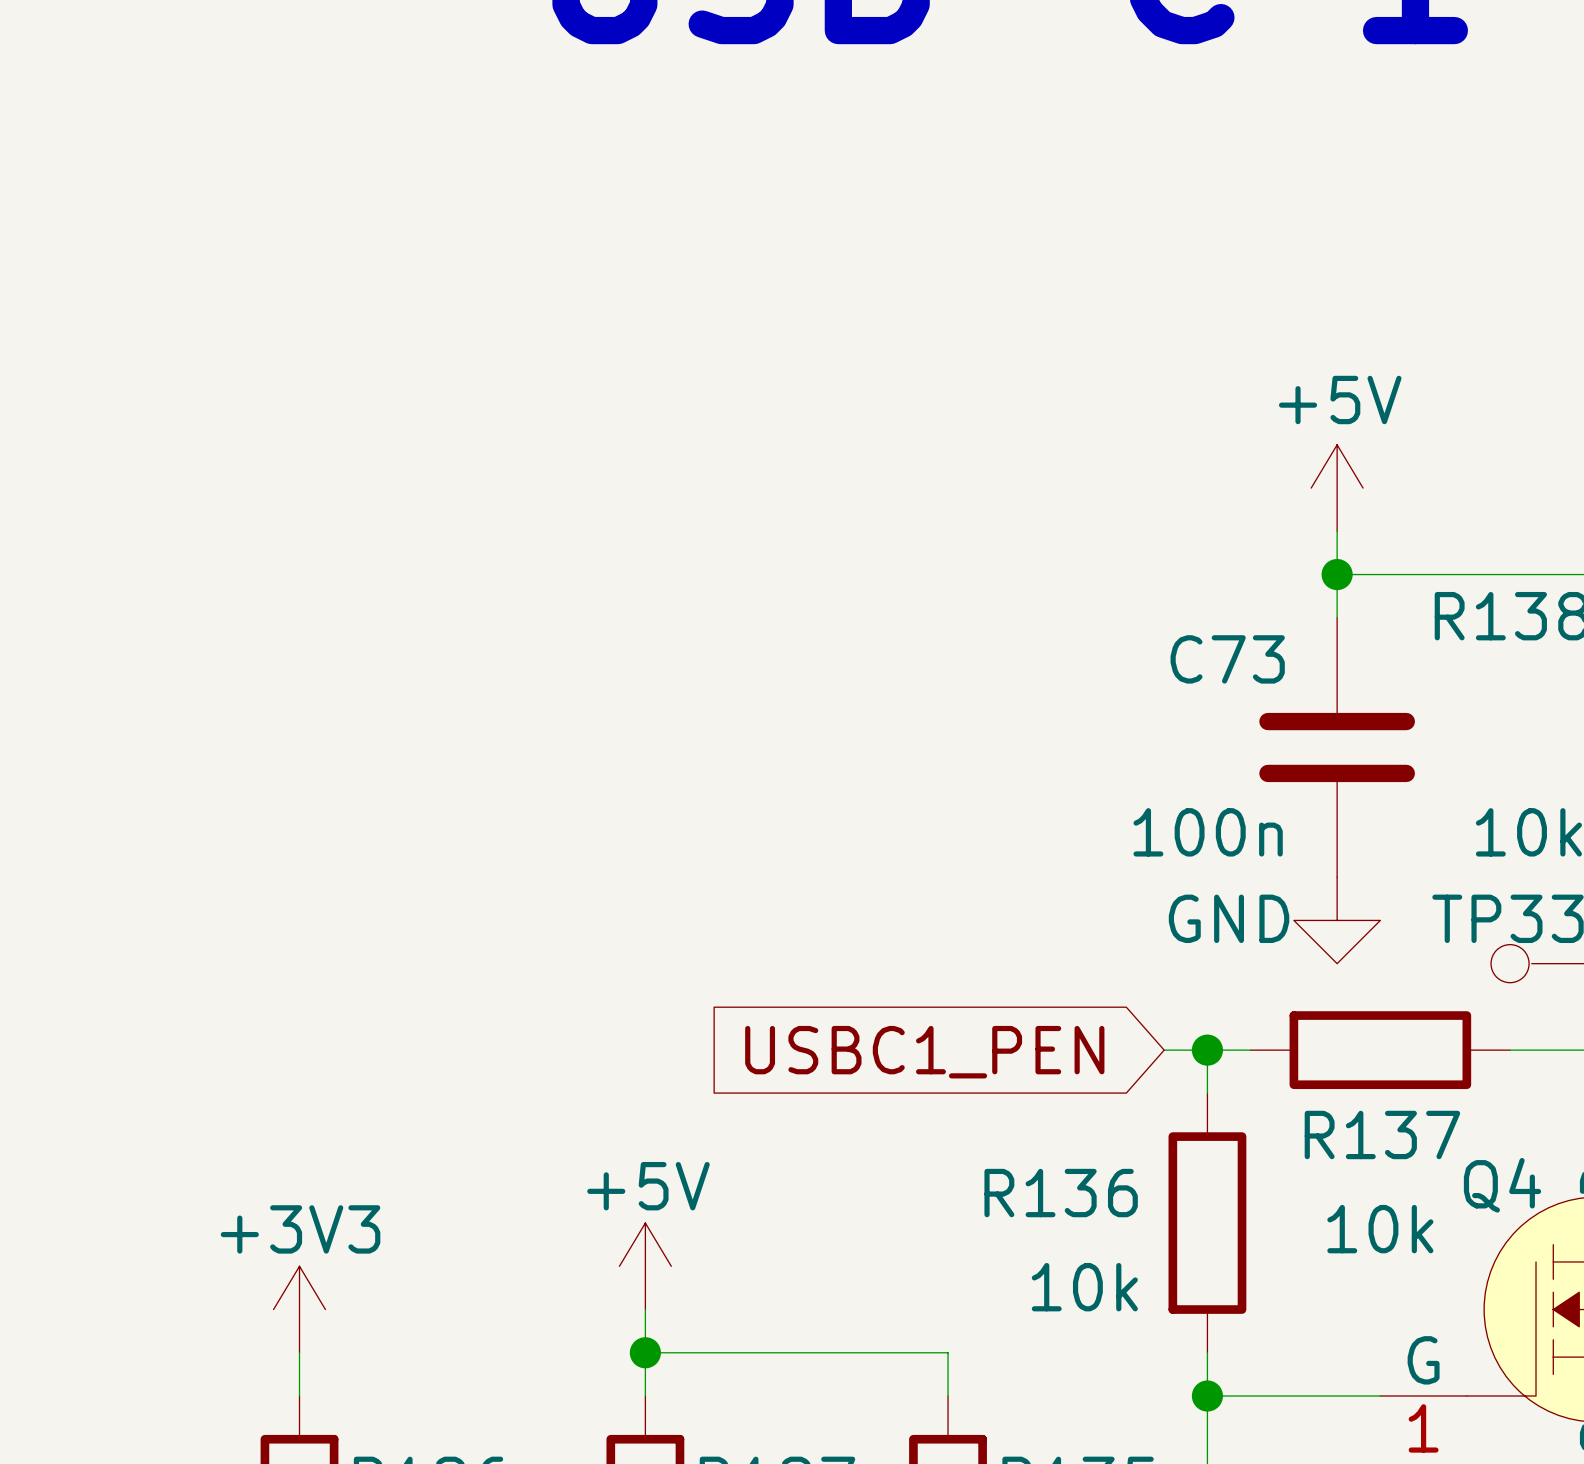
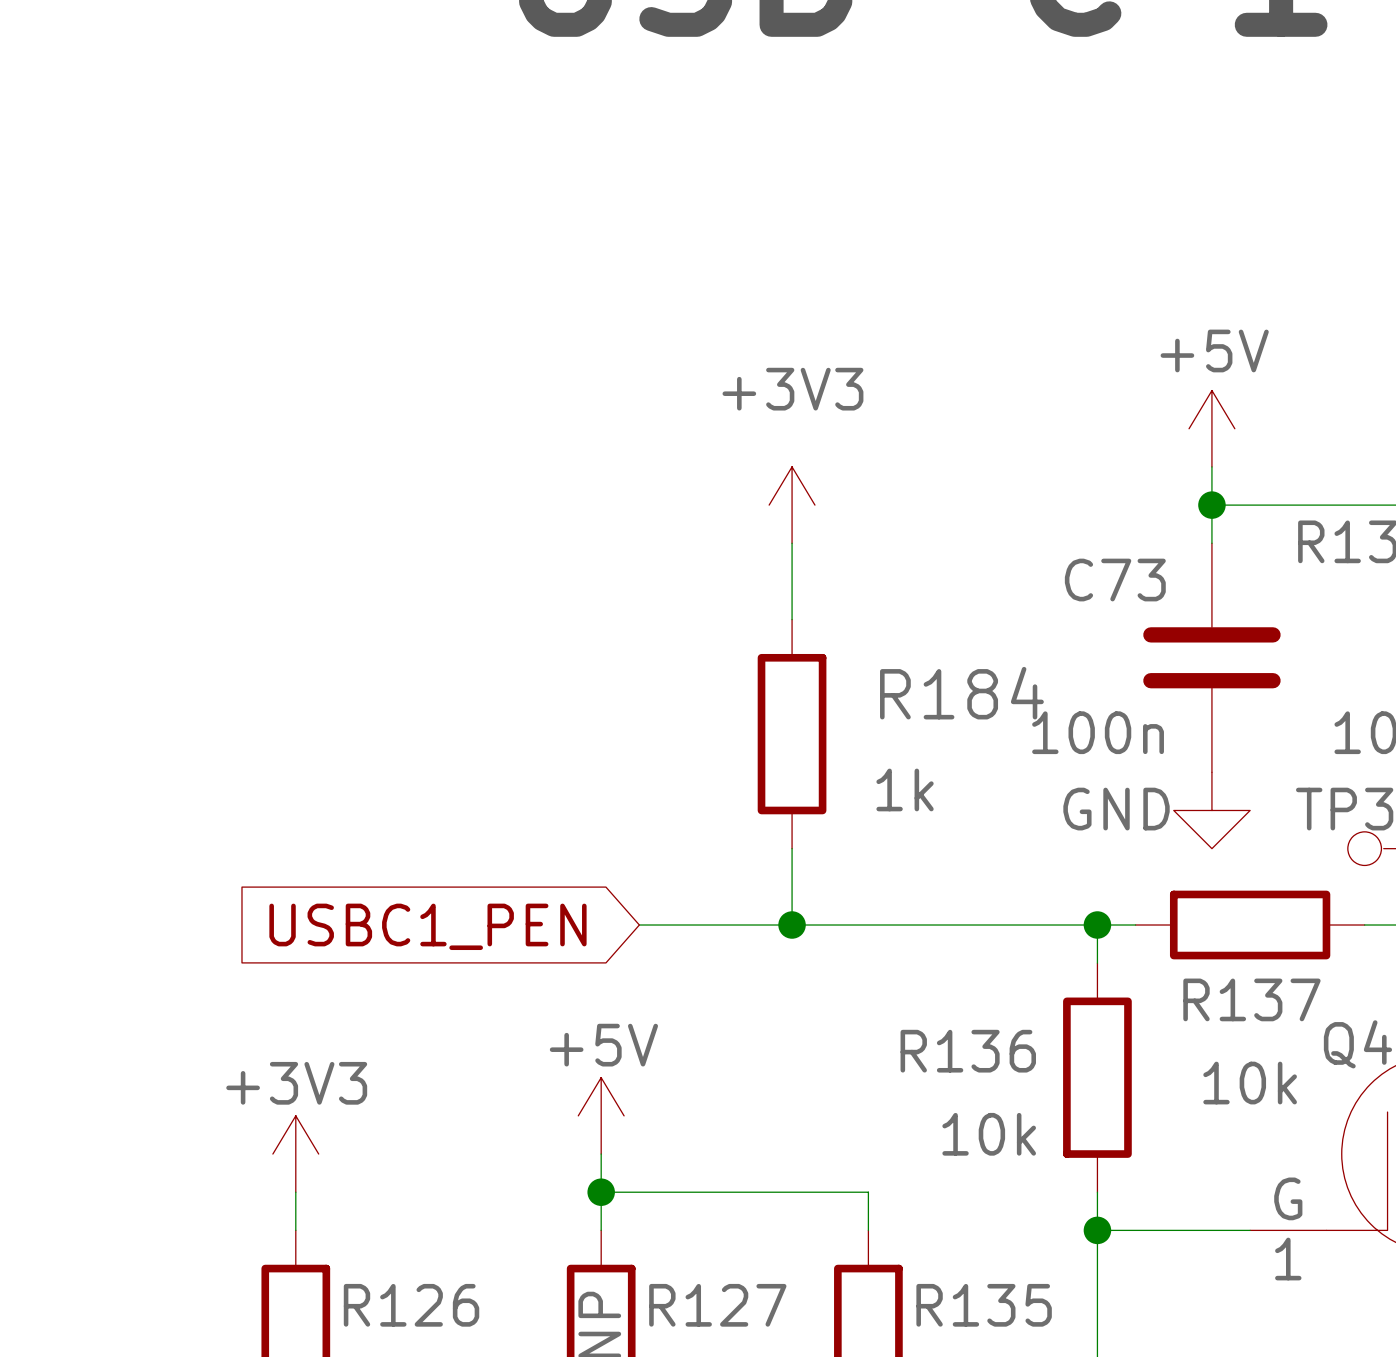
power symbol: none -> +3V3 (792, 505)
wire: none -> (792, 543) (792, 619)
R184: none -> (792, 734)
wire: none -> (792, 848) (792, 925)
wire: none -> (639, 925) (1059, 925)
junction: none -> (792, 925)
global label position: USBC1_PEN (924, 1052) -> USBC1_PEN (427, 926)

